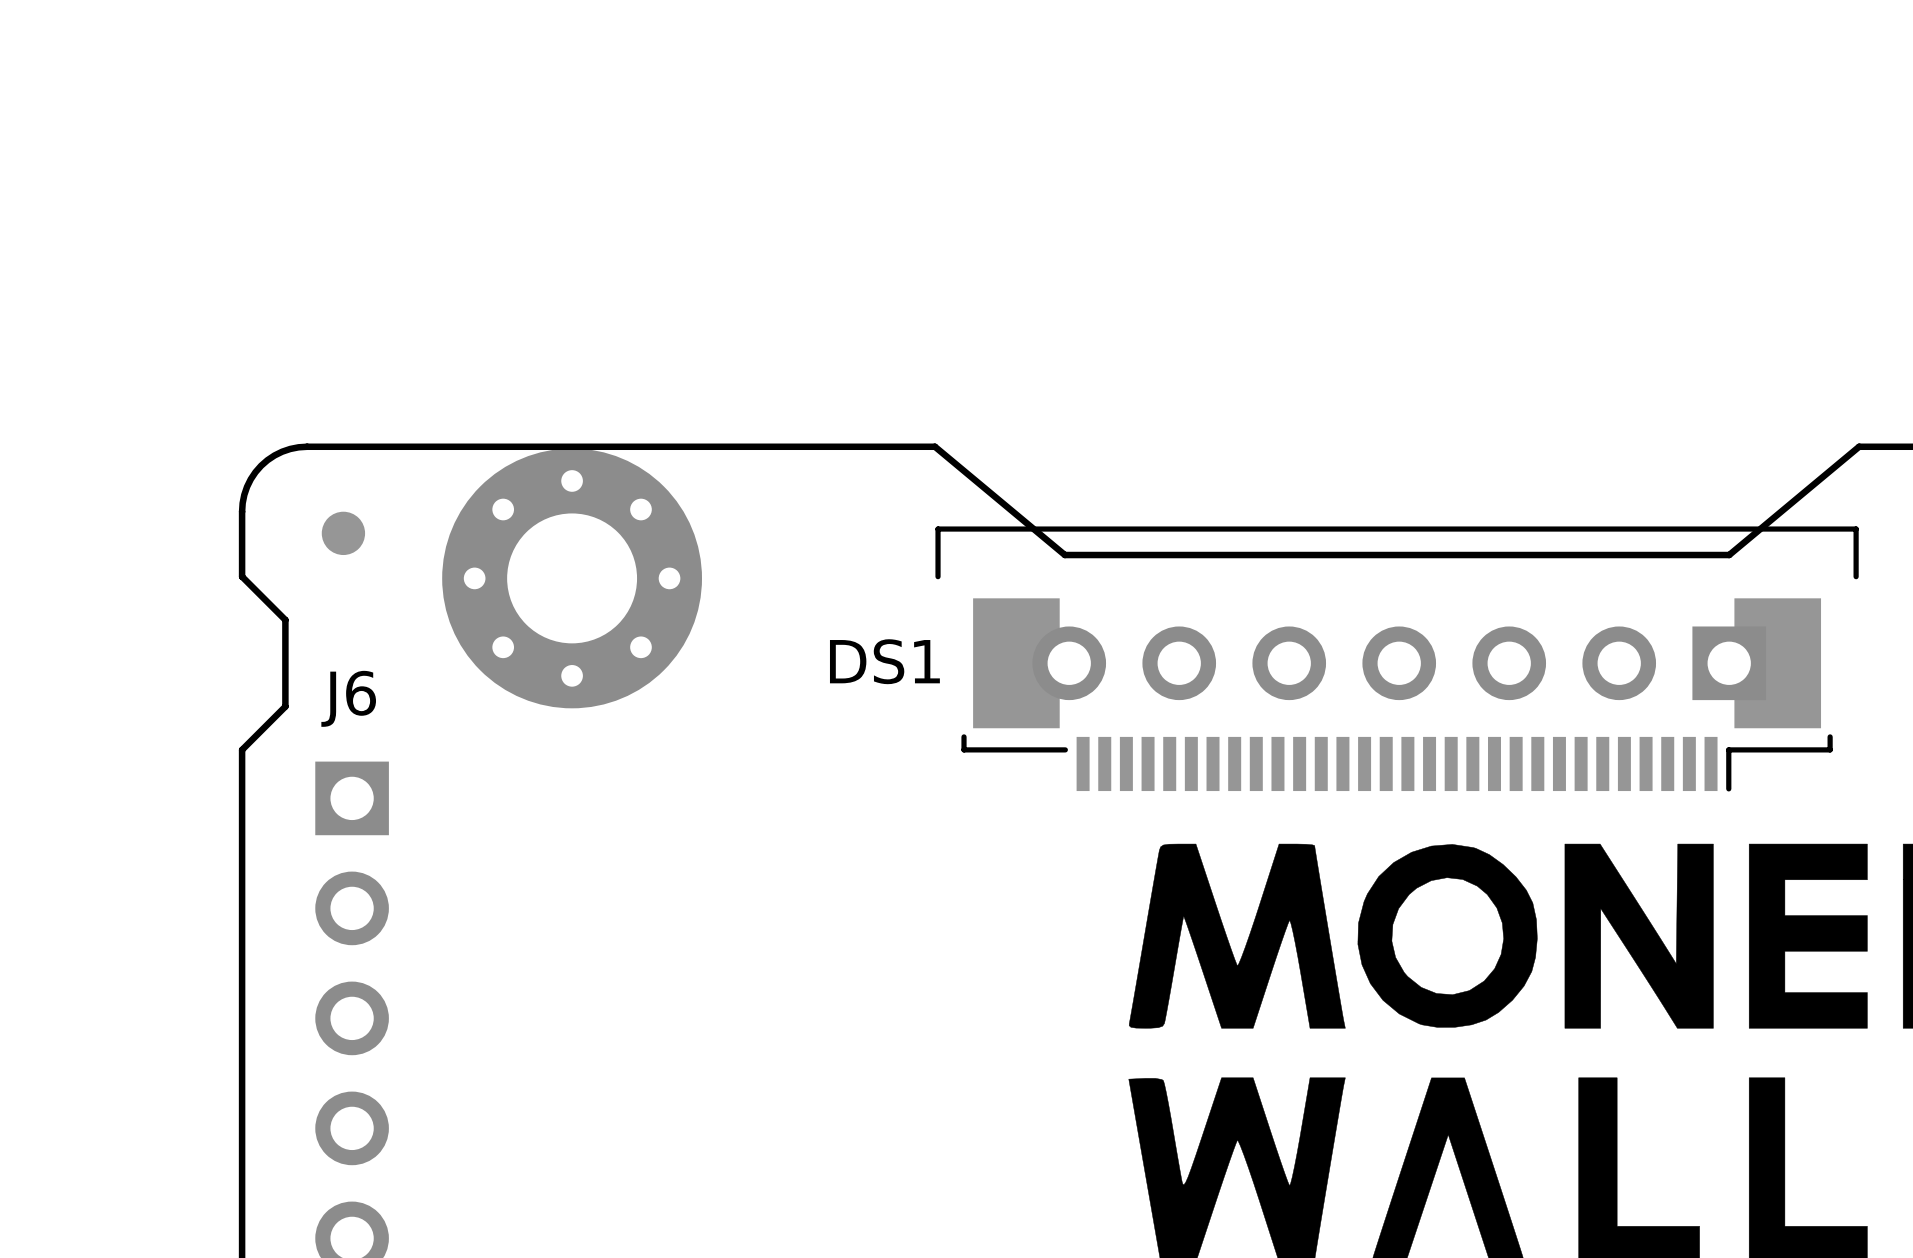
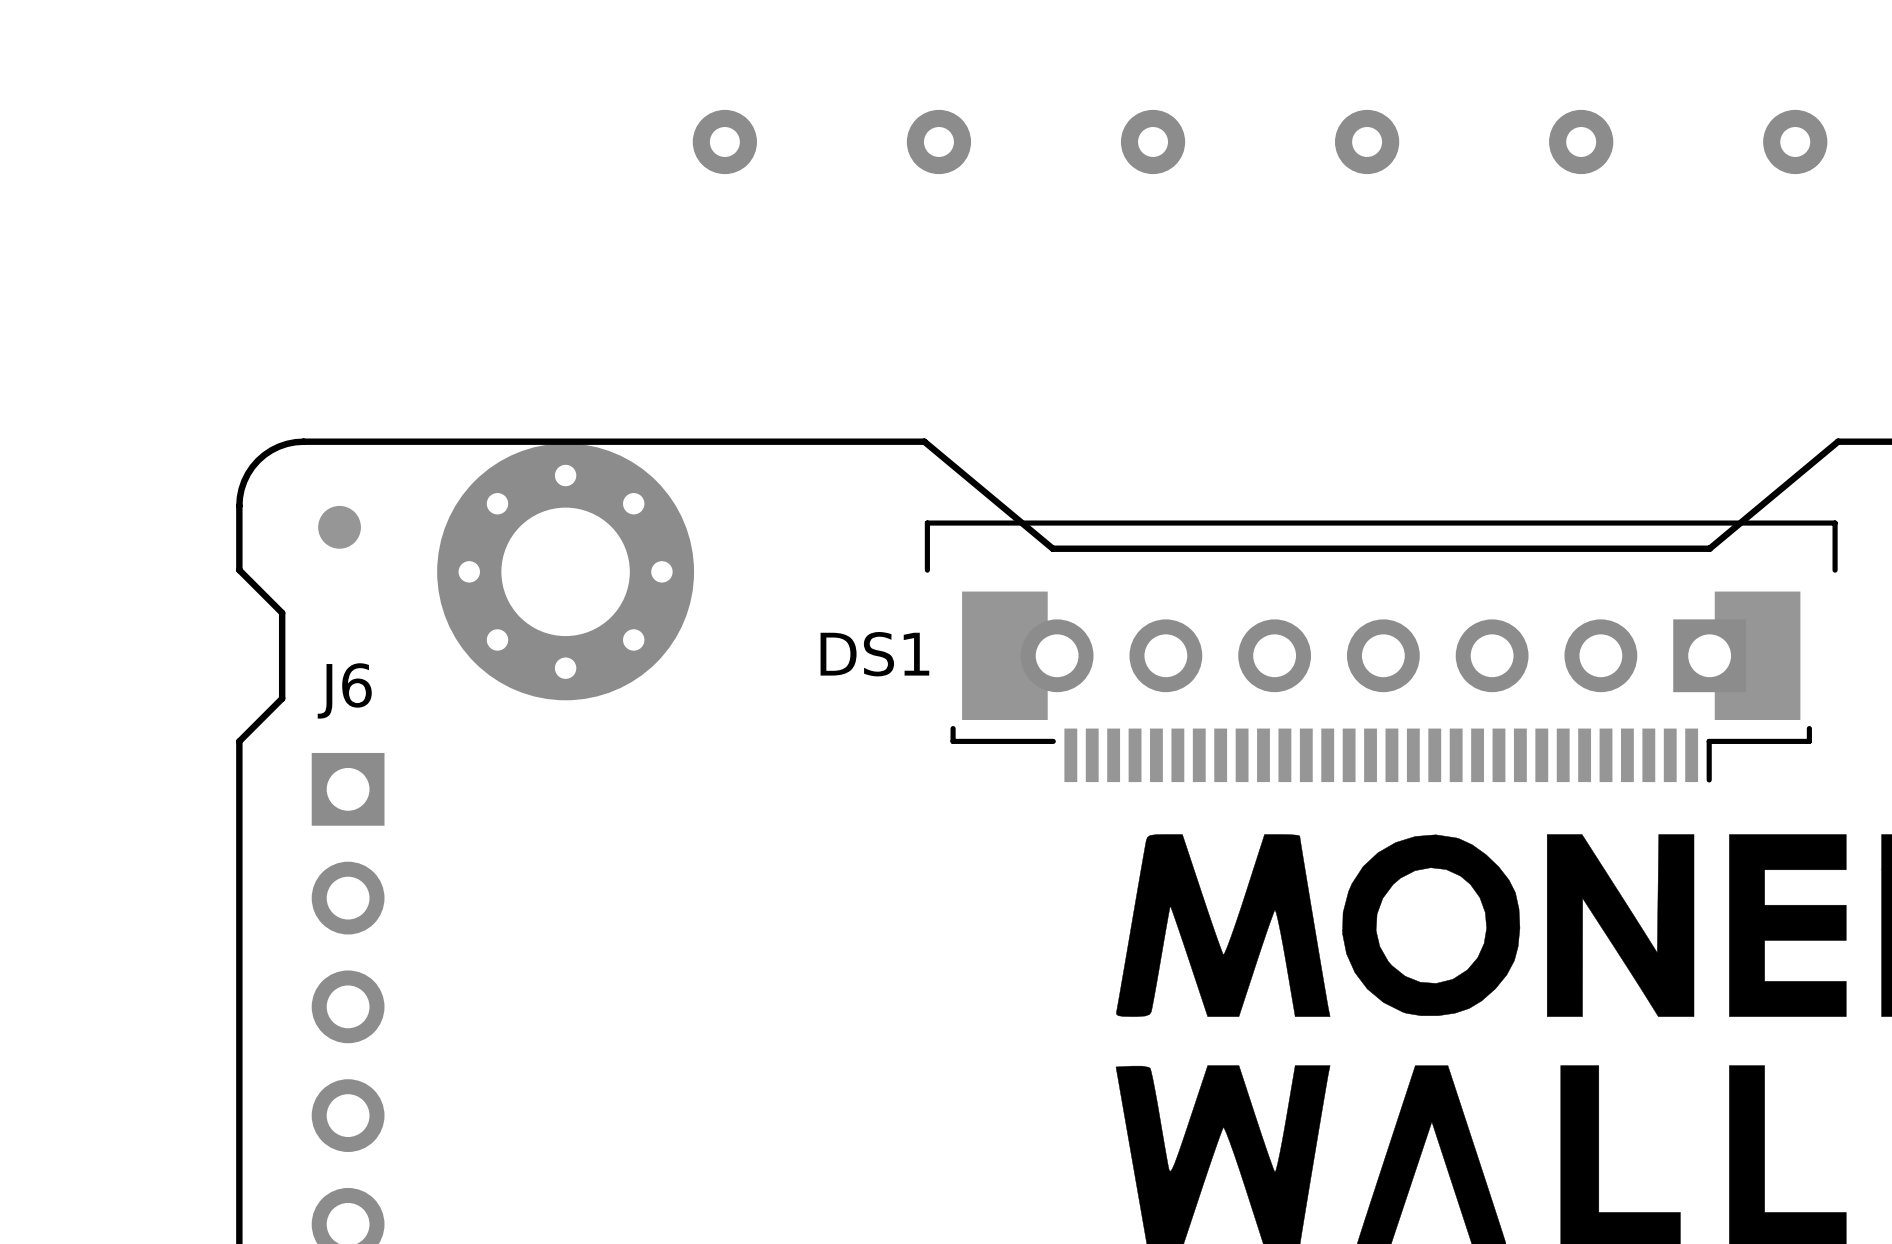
part: none -> (724, 141)
part: none -> (938, 141)
part: none -> (1153, 141)
part: none -> (1367, 141)
part: none -> (1581, 141)
part: none -> (1795, 141)

